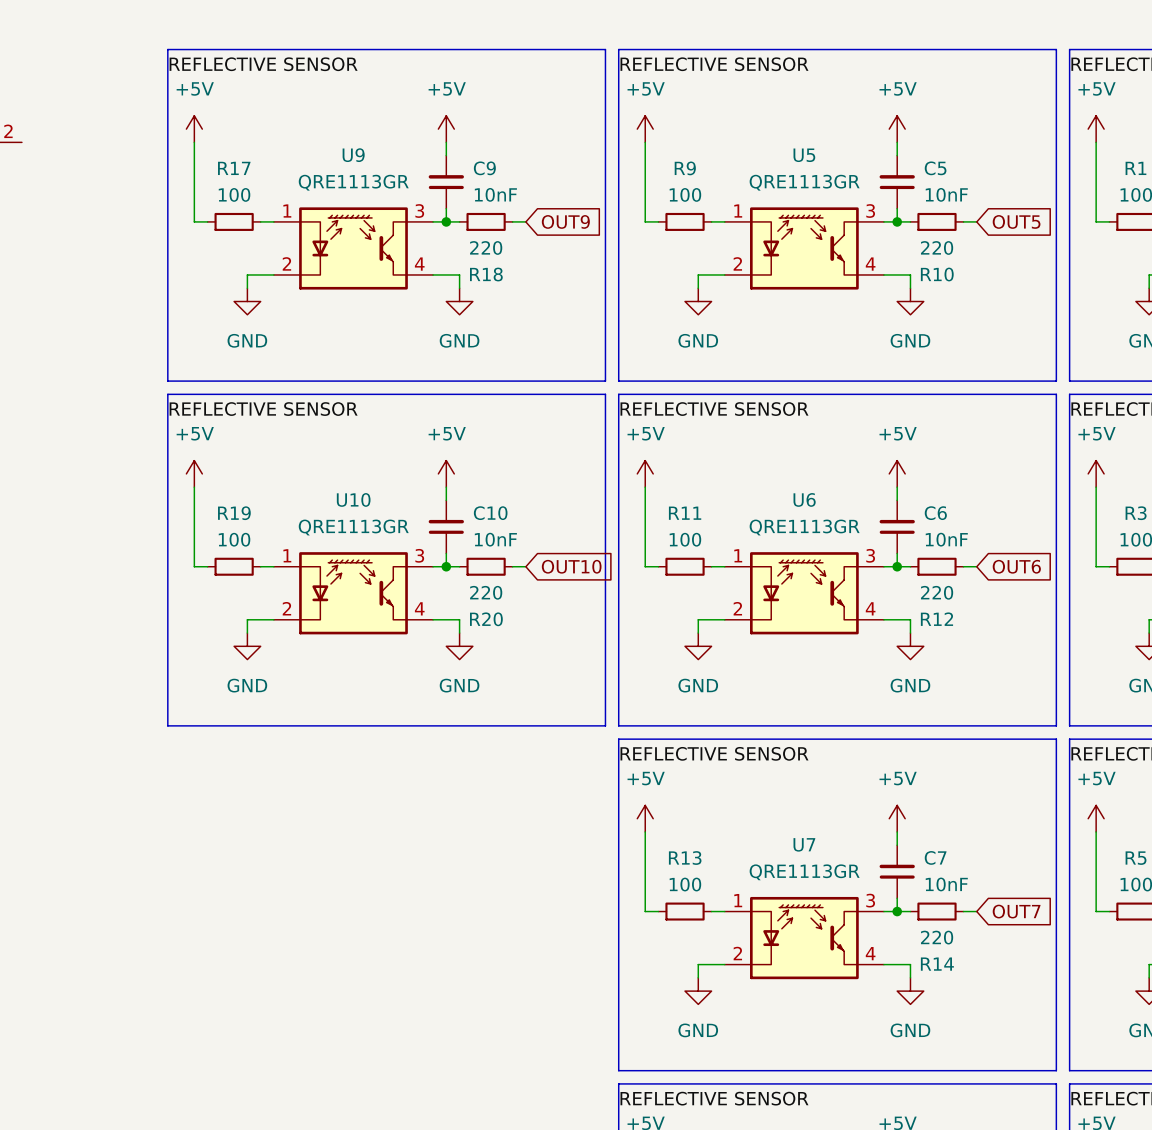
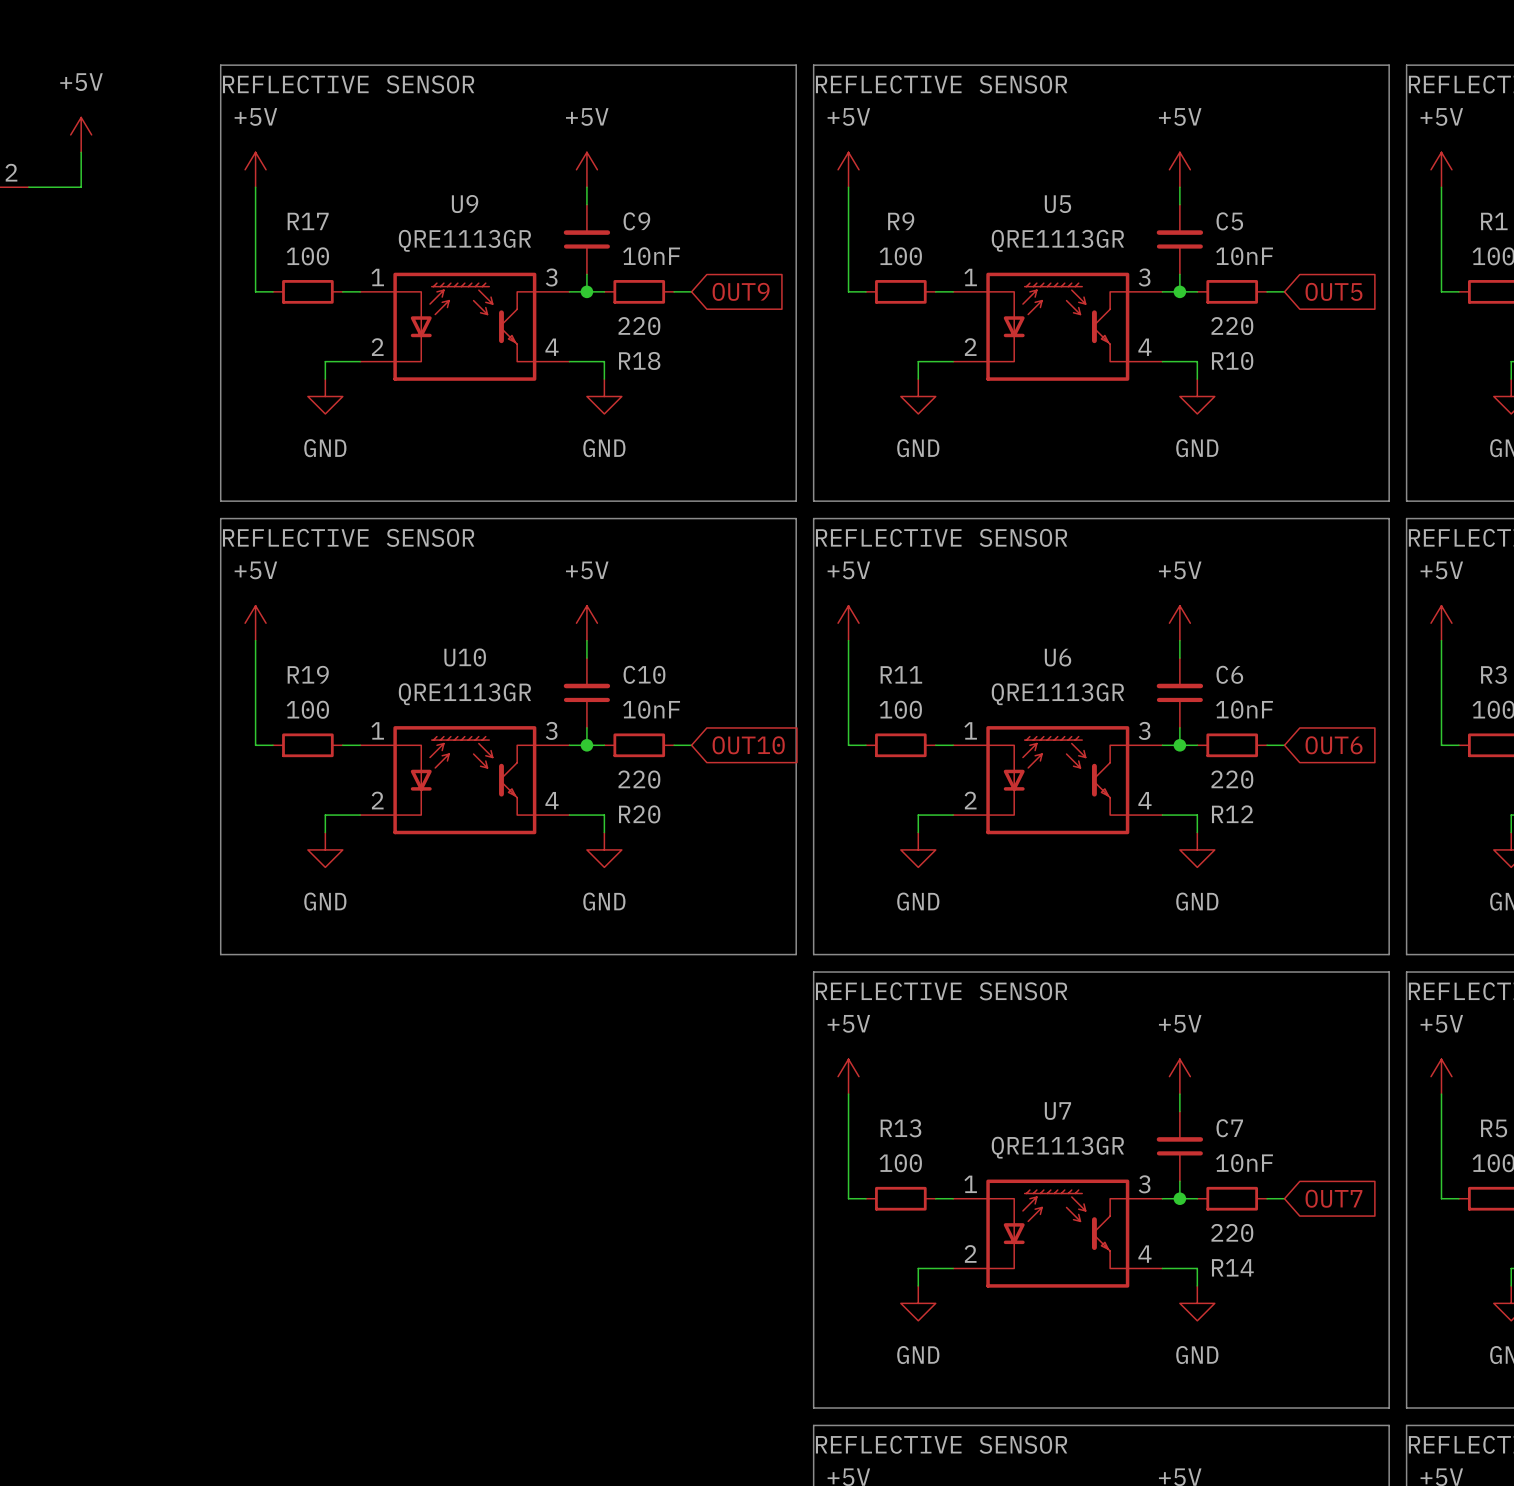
power symbol: none -> +5V (81, 134)
wire: none -> (81, 152) (81, 187) (28, 187)

